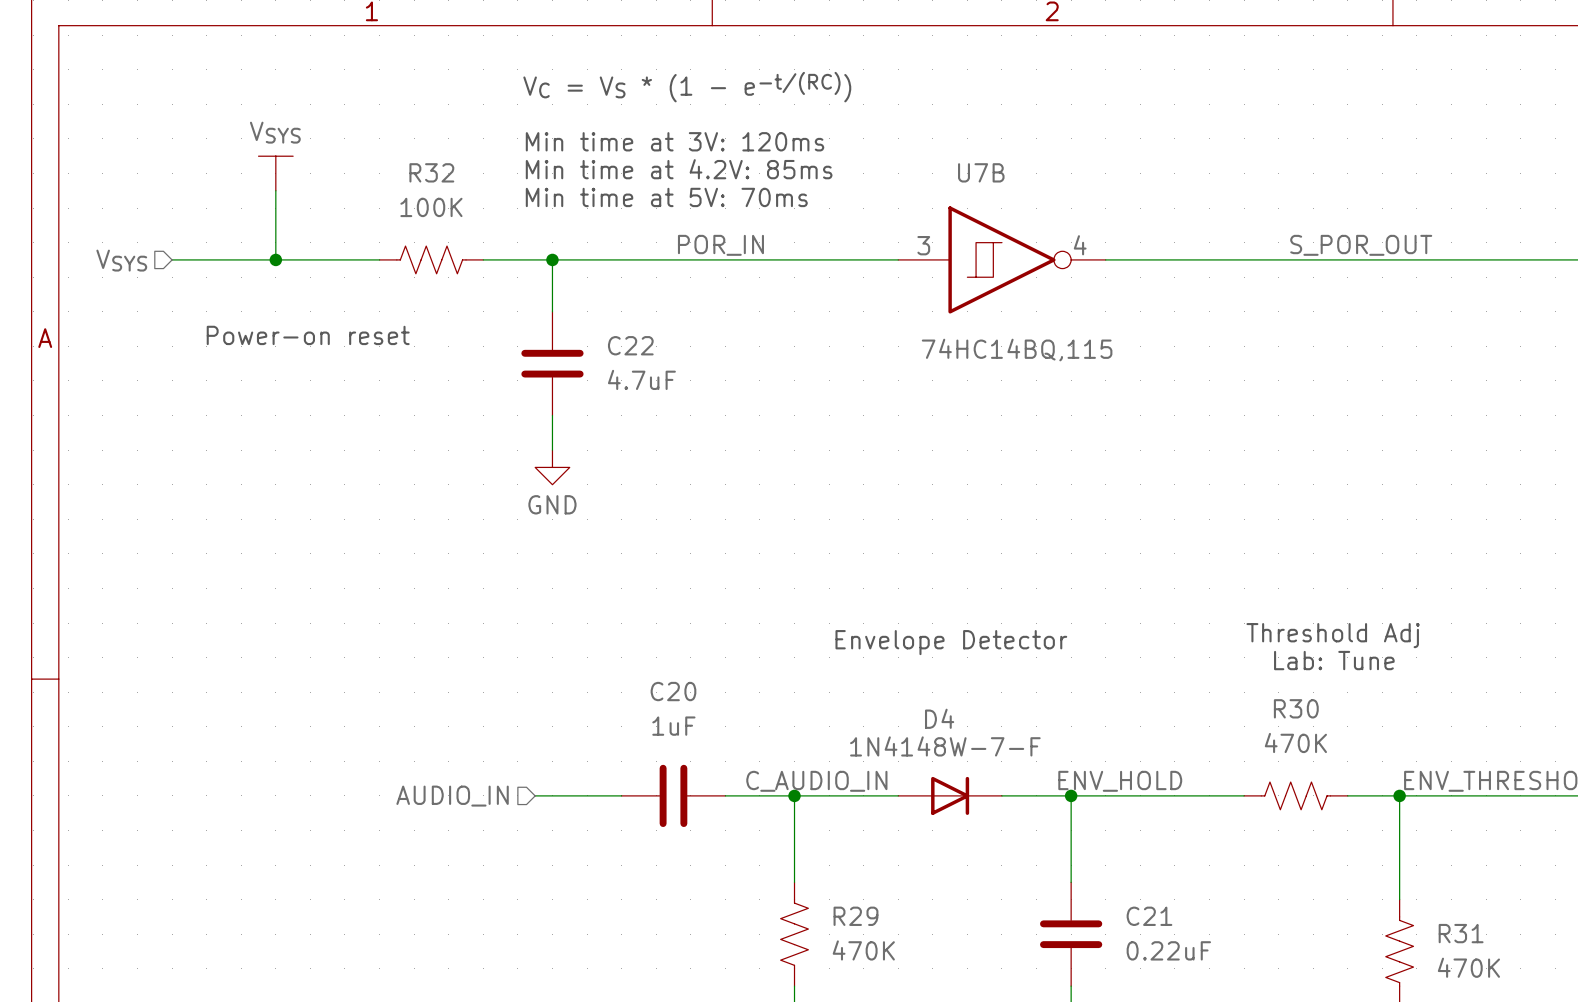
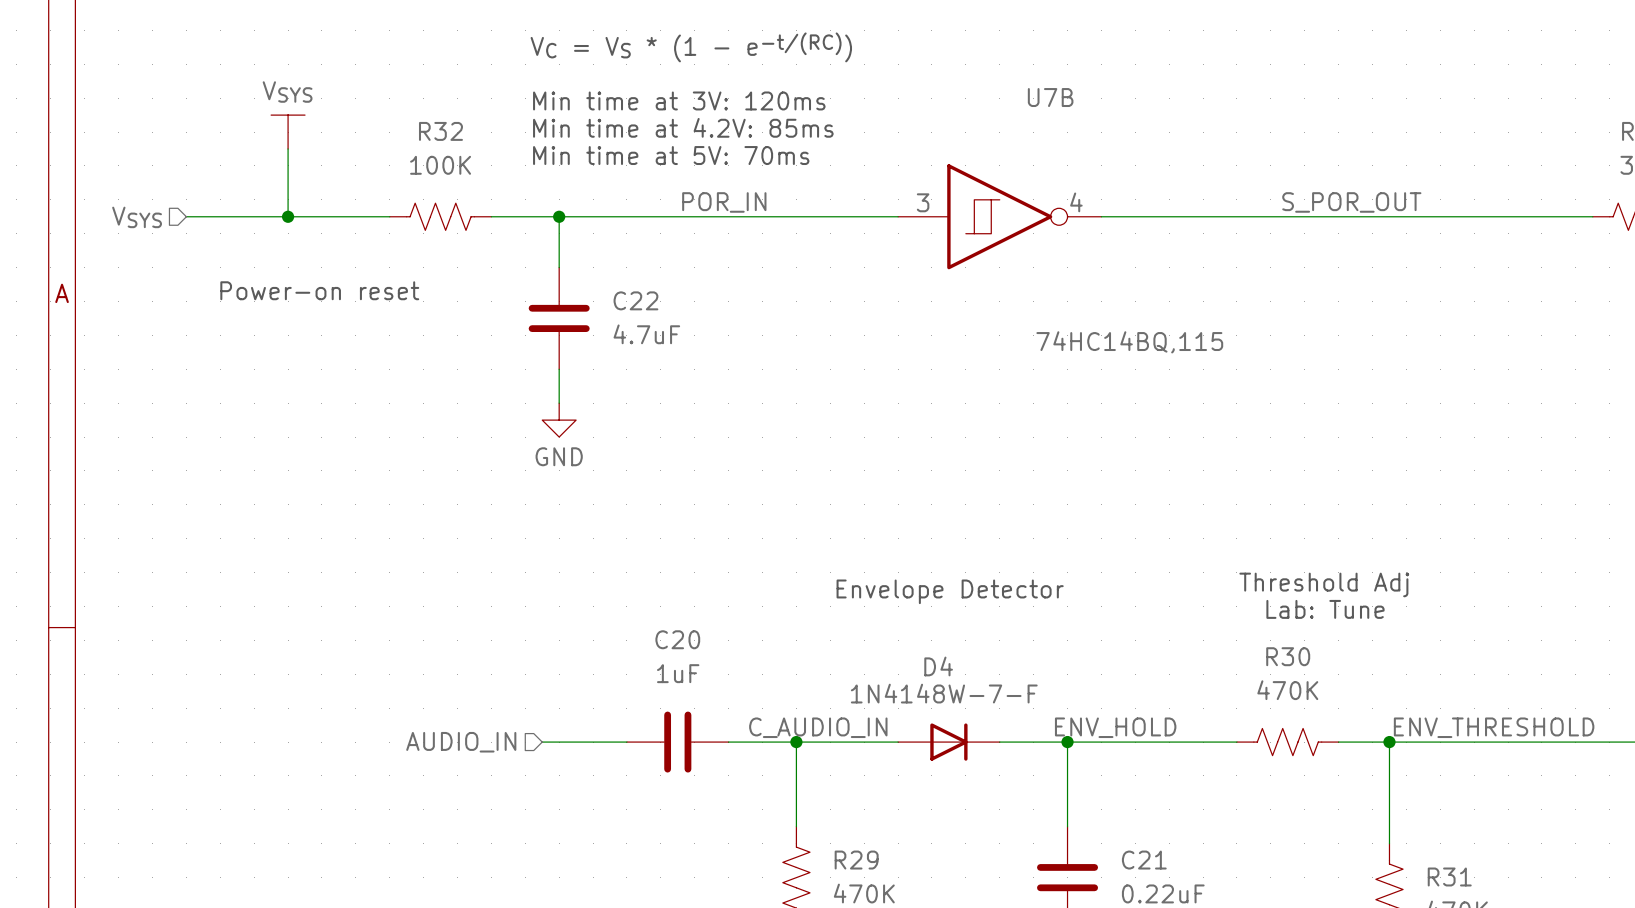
U7B name position: U7B (981, 172) -> U7B (1050, 97)
U7B value position: 74HC14BQ,115 (1017, 350) -> 74HC14BQ,115 (1129, 342)

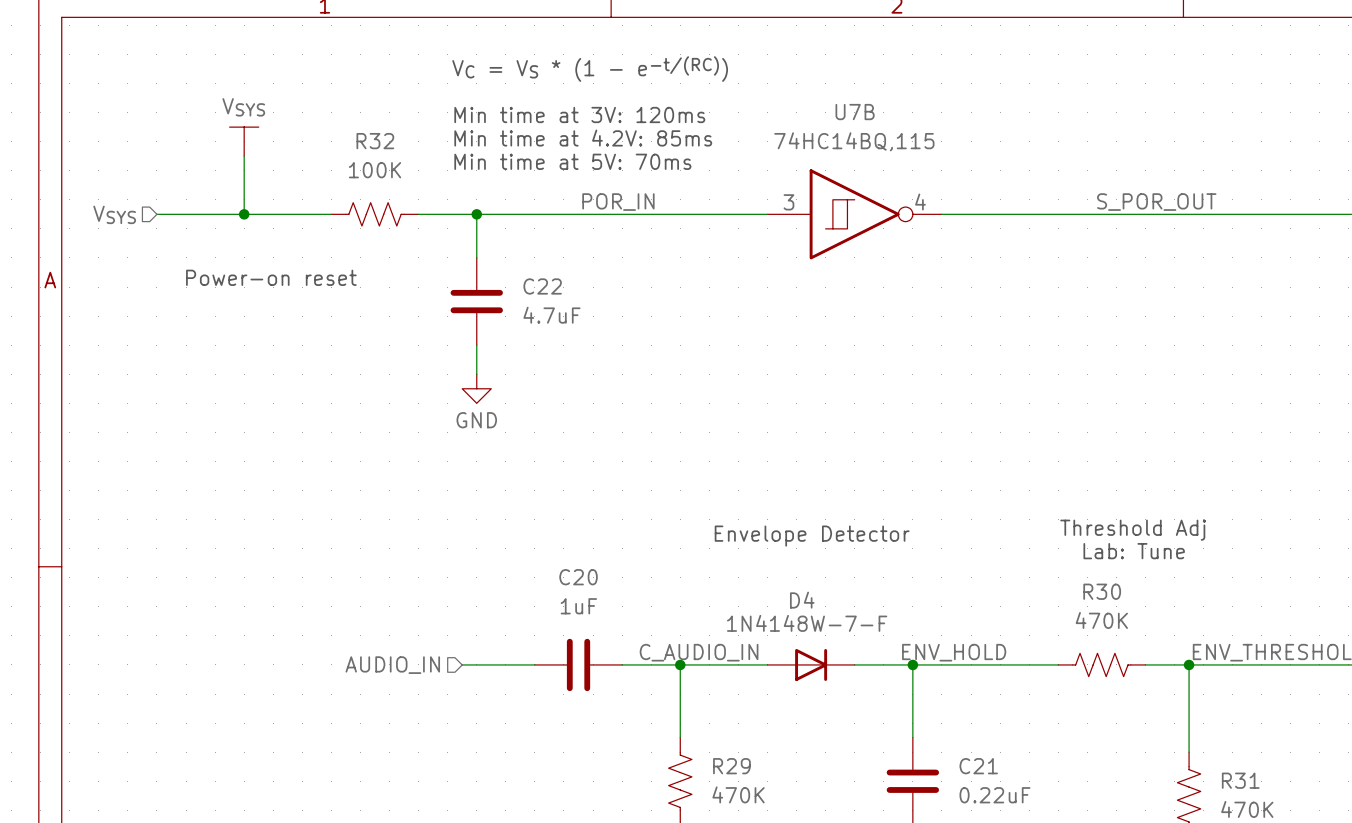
U7B name position: U7B (1050, 97) -> U7B (855, 112)
U7B value position: 74HC14BQ,115 (1129, 342) -> 74HC14BQ,115 (854, 141)

